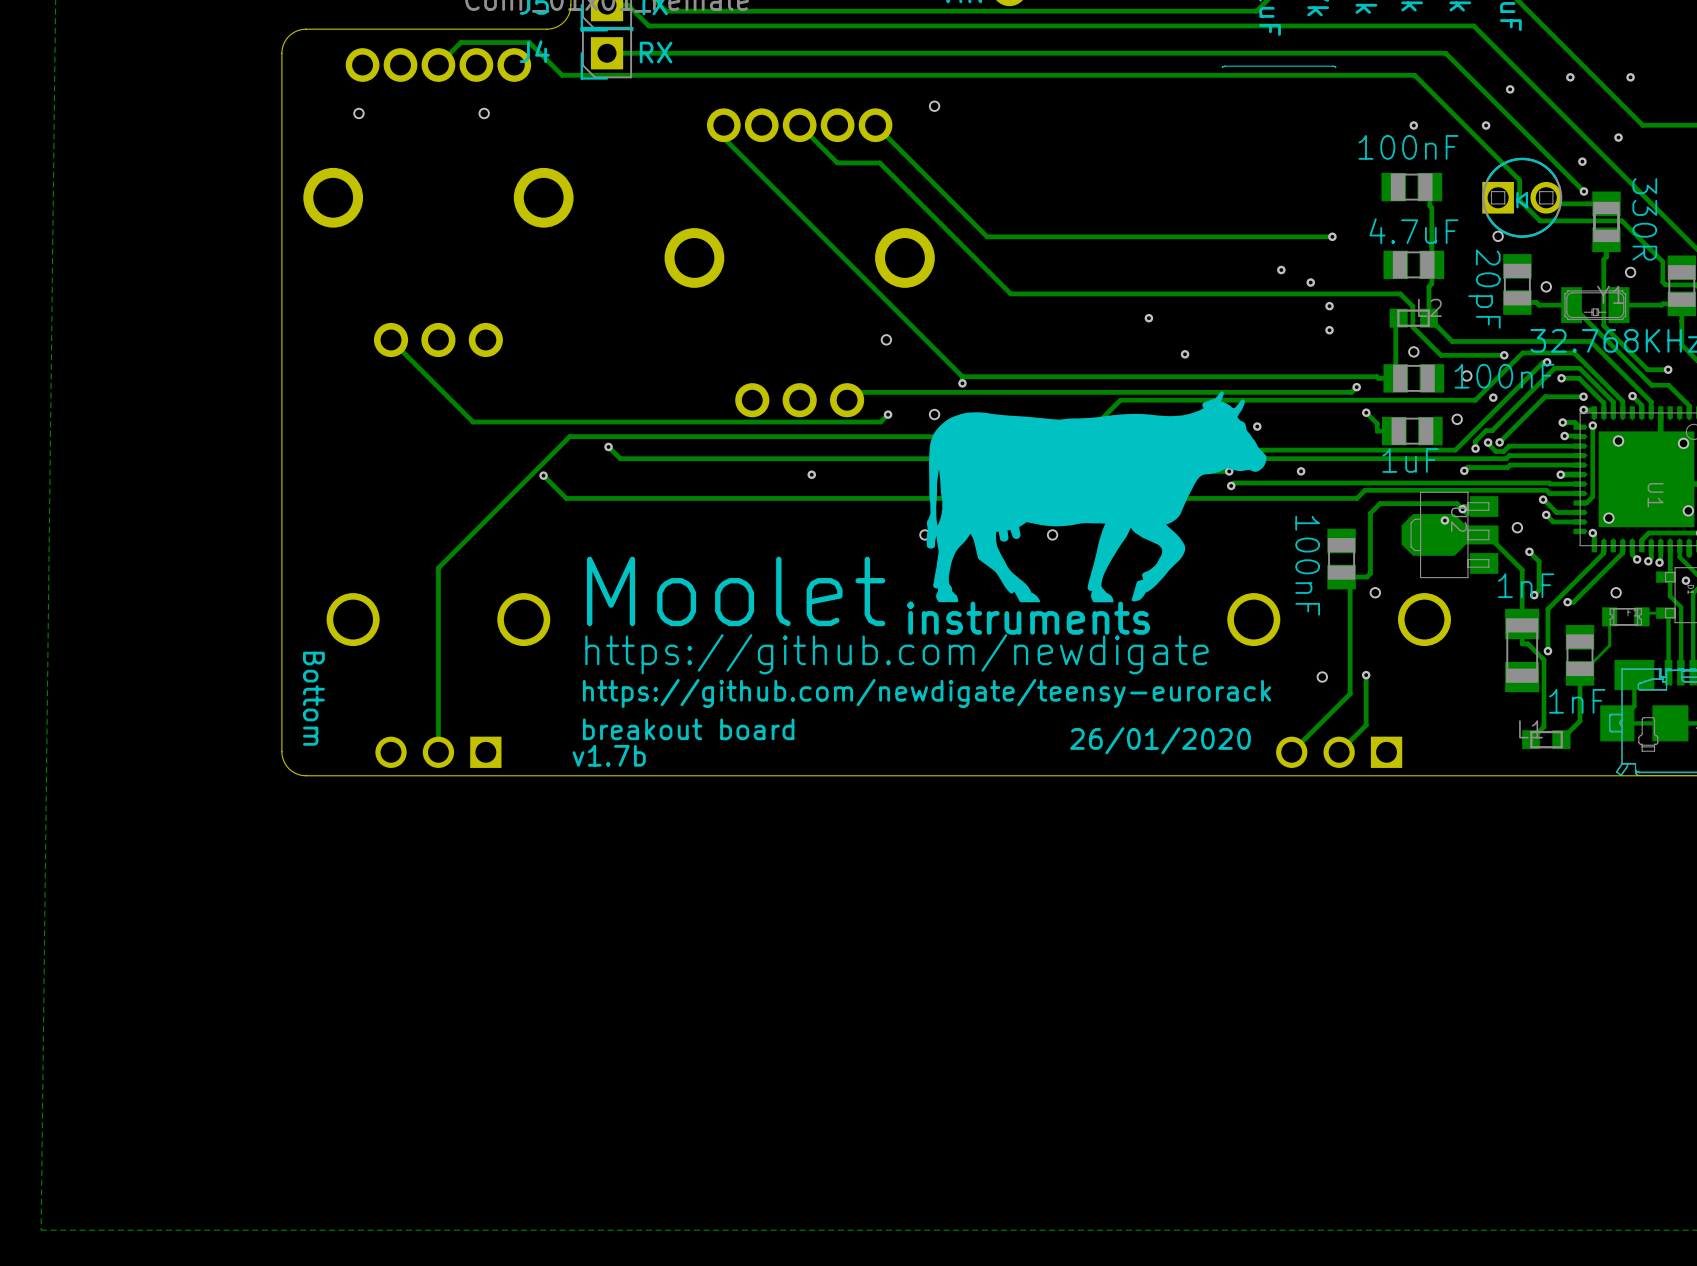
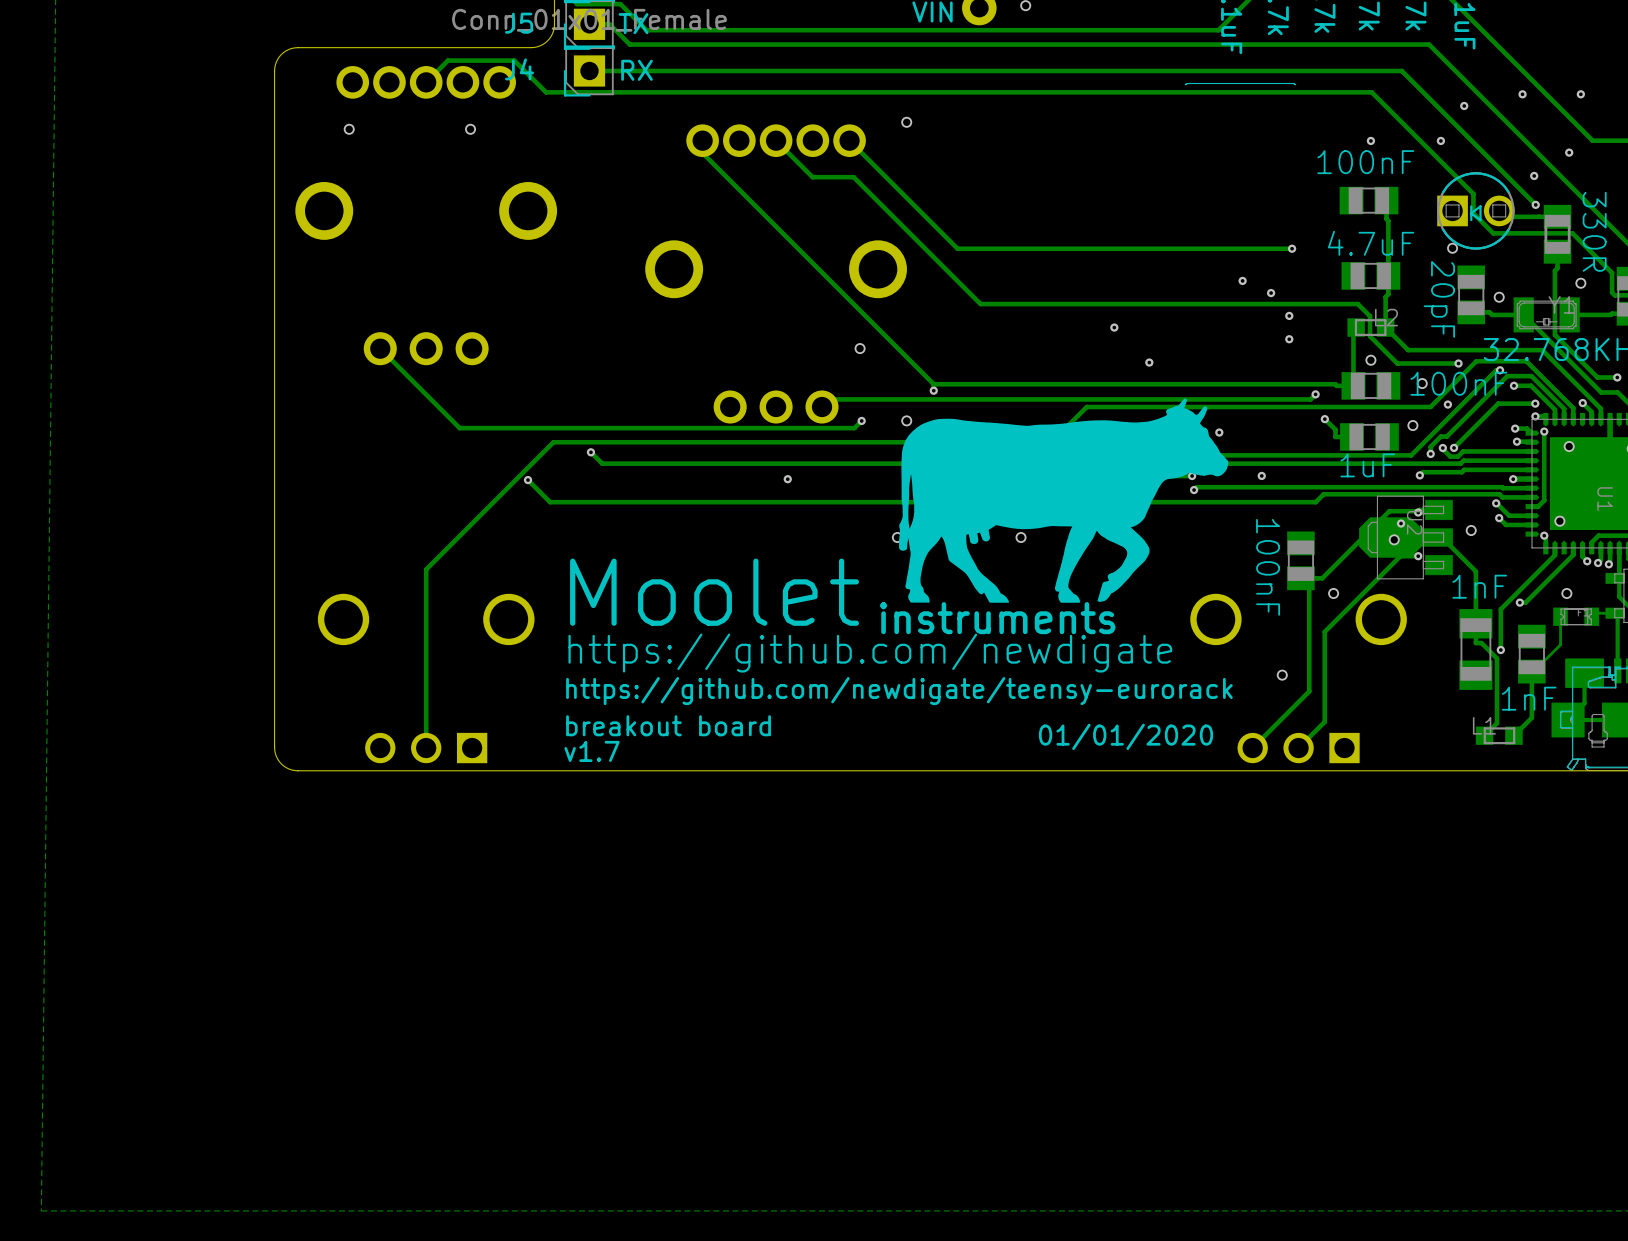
track: (1469, 513) (1466, 513) (1457, 503) (1380, 503) (1370, 513) (1370, 573) (1366, 577) (1363, 577) -> (1418, 511) (1389, 511) (1322, 578)
via: none -> (1394, 539)
track: (1529, 551) (1539, 561) (1539, 590) (1534, 595) -> none
via: (1529, 551) -> none
track: none -> (1418, 556) (1400, 556) (1324, 631) (1324, 673)
via: none -> (1418, 556)
via: (1534, 595) -> none
via: (1366, 675) -> none
text: Bottom (313, 698) -> none
text: 26/01/2020 (1160, 740) -> 01/01/2020 (1125, 736)
text: v1.7b (609, 755) -> v1.7 (592, 751)

